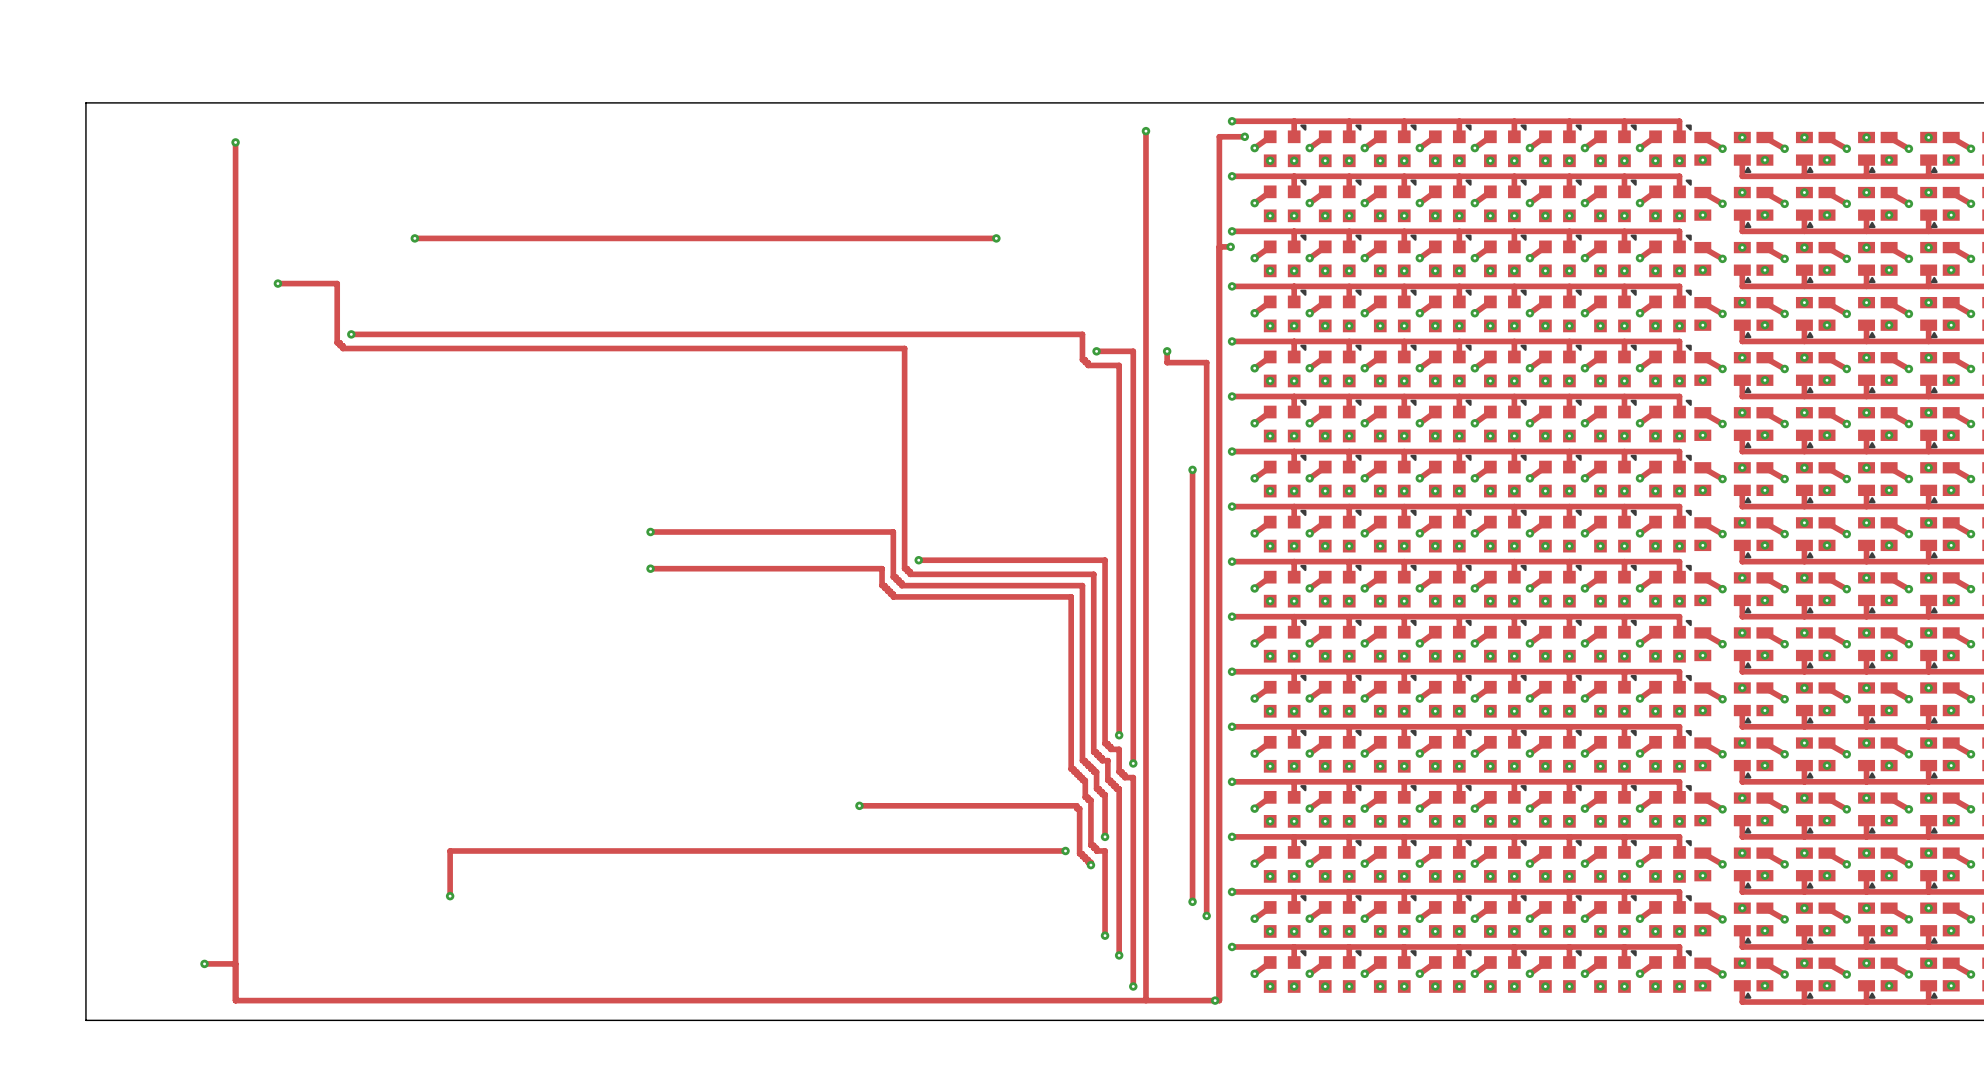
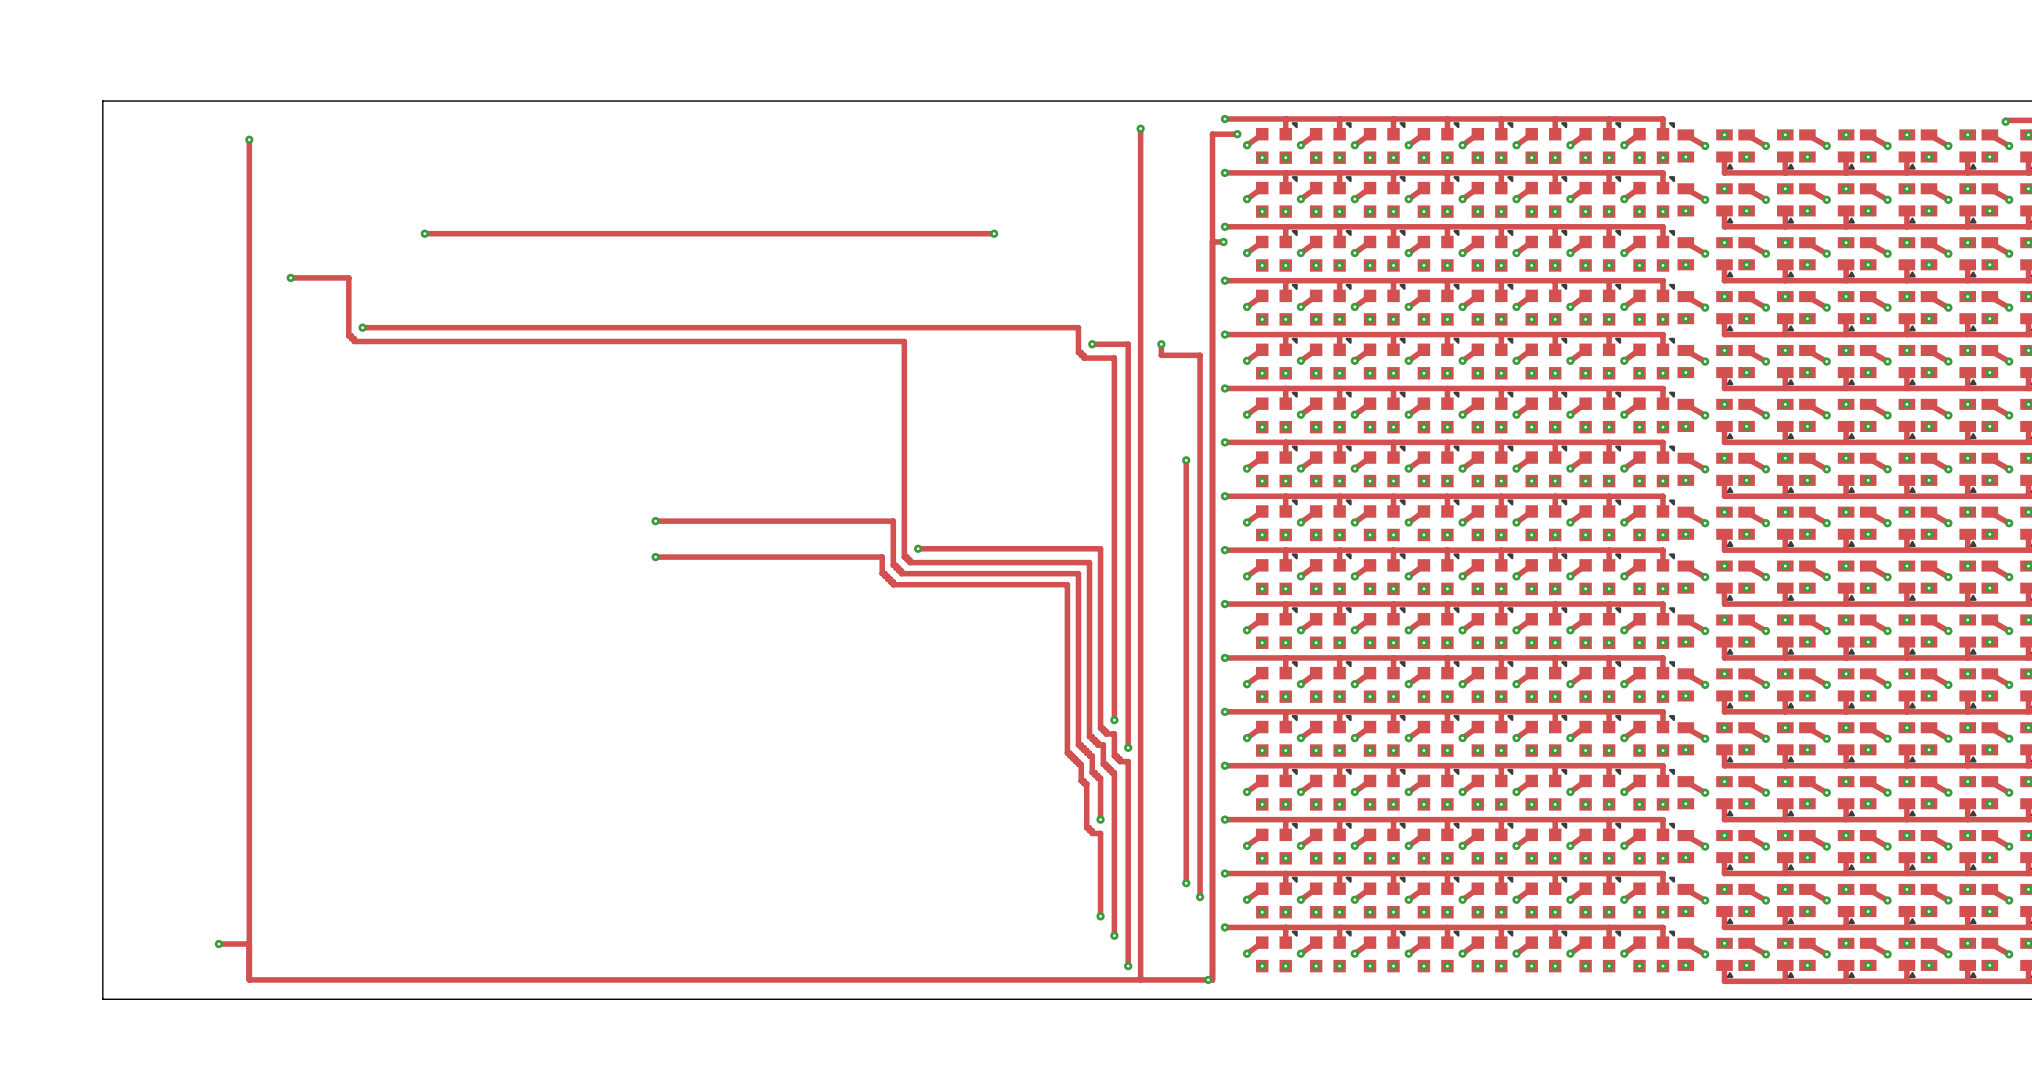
track: (859, 805) (1076, 805) (1076, 808) (1079, 808) (1079, 853) (1085, 856) (1088, 862) (1090, 862) (1090, 865) -> none
via: (859, 805) -> none
track: (1065, 850) (450, 850) (450, 896) -> none
via: (1065, 850) -> none
via: (1090, 865) -> none
via: (450, 896) -> none

